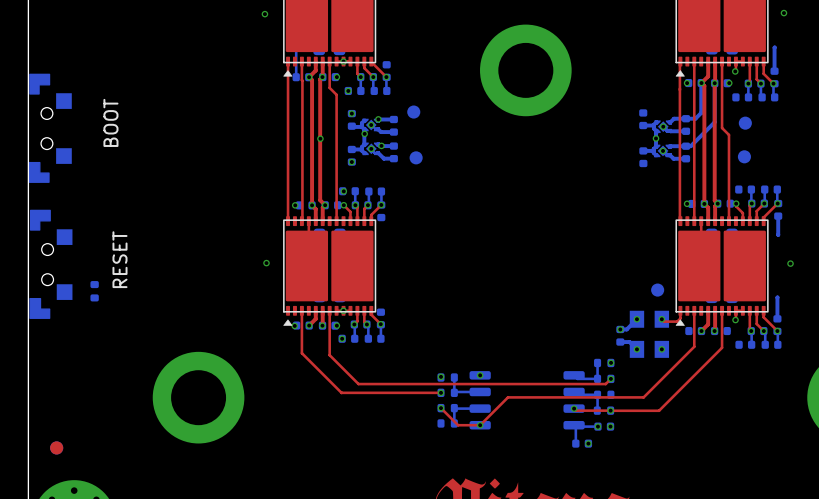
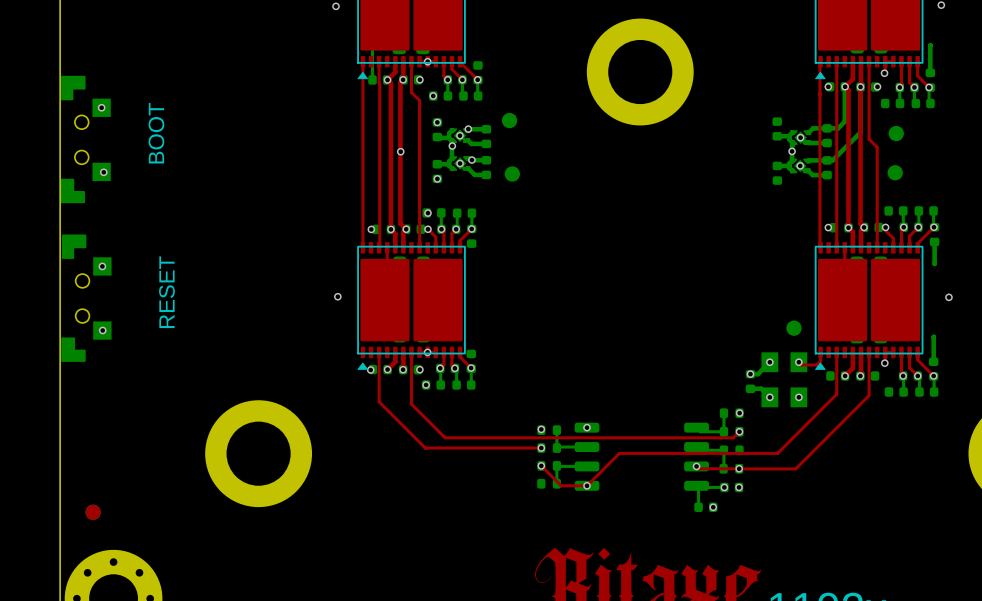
via: none -> (101, 107)
via: none -> (103, 172)
via: none -> (102, 266)
part: (94, 291) -> none
via: none -> (102, 330)

